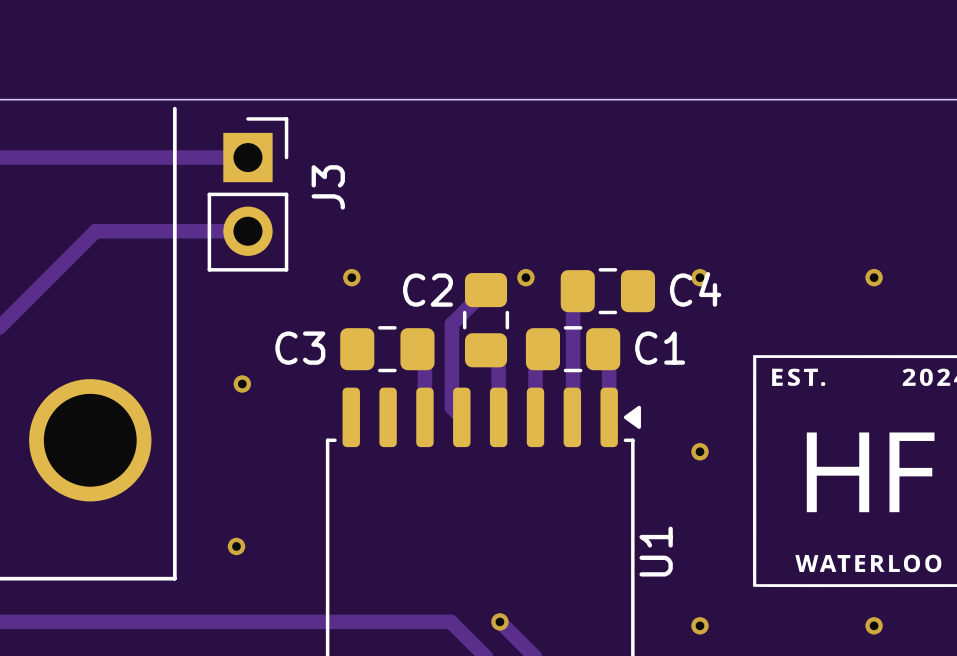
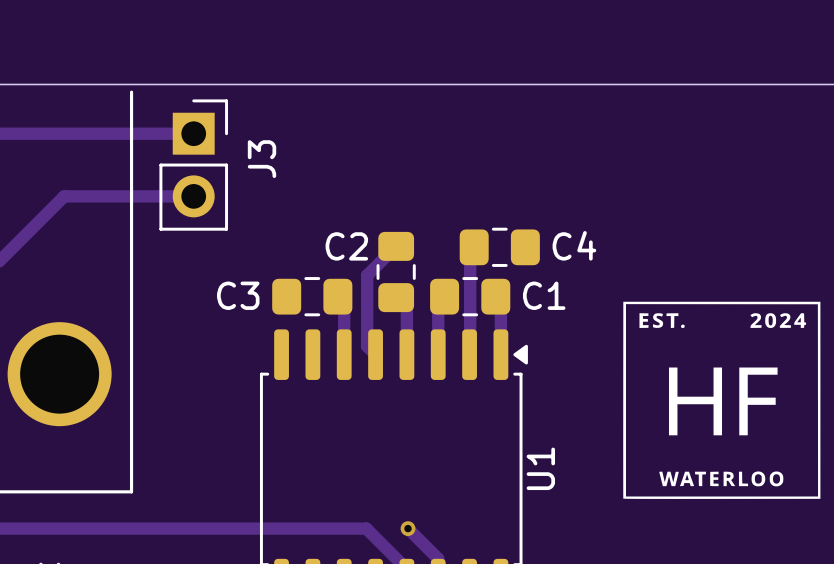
via: (351, 277) -> none
via: (525, 277) -> none
via: (700, 277) -> none
via: (874, 277) -> none
via: (242, 384) -> none
via: (700, 451) -> none
via: (236, 546) -> none
via: (700, 625) -> none
via: (874, 625) -> none

